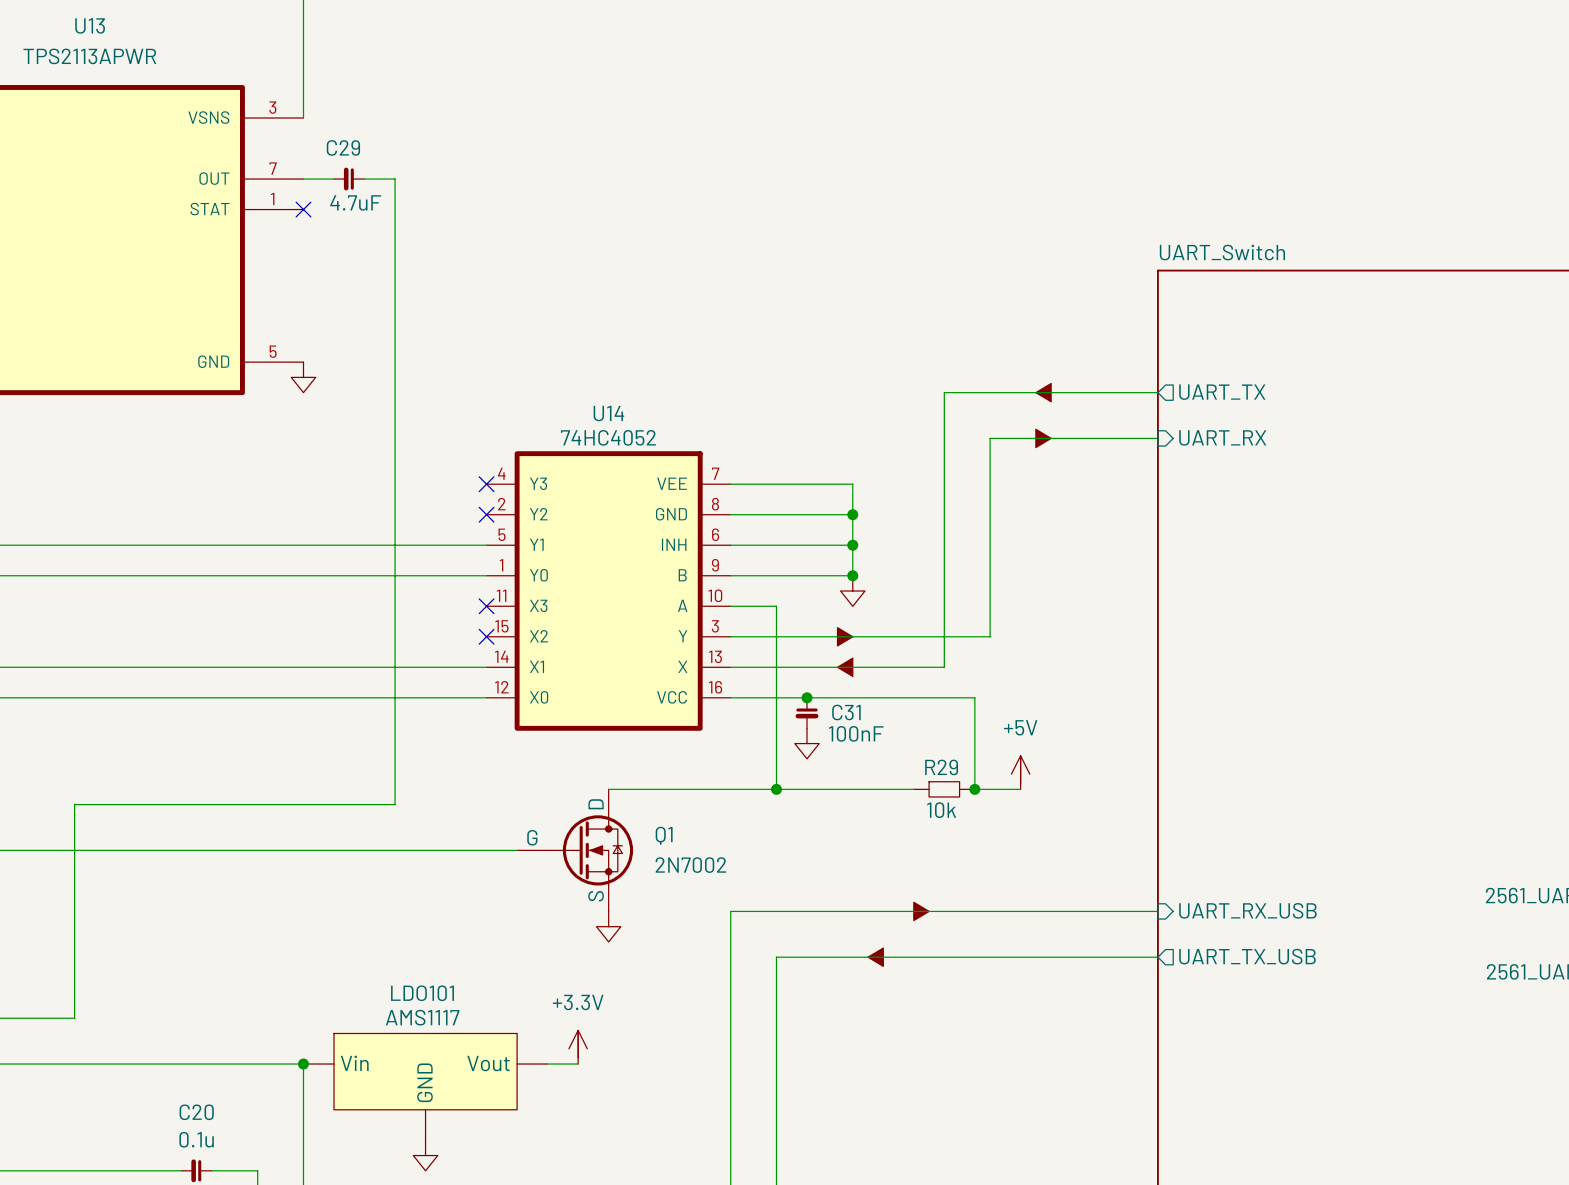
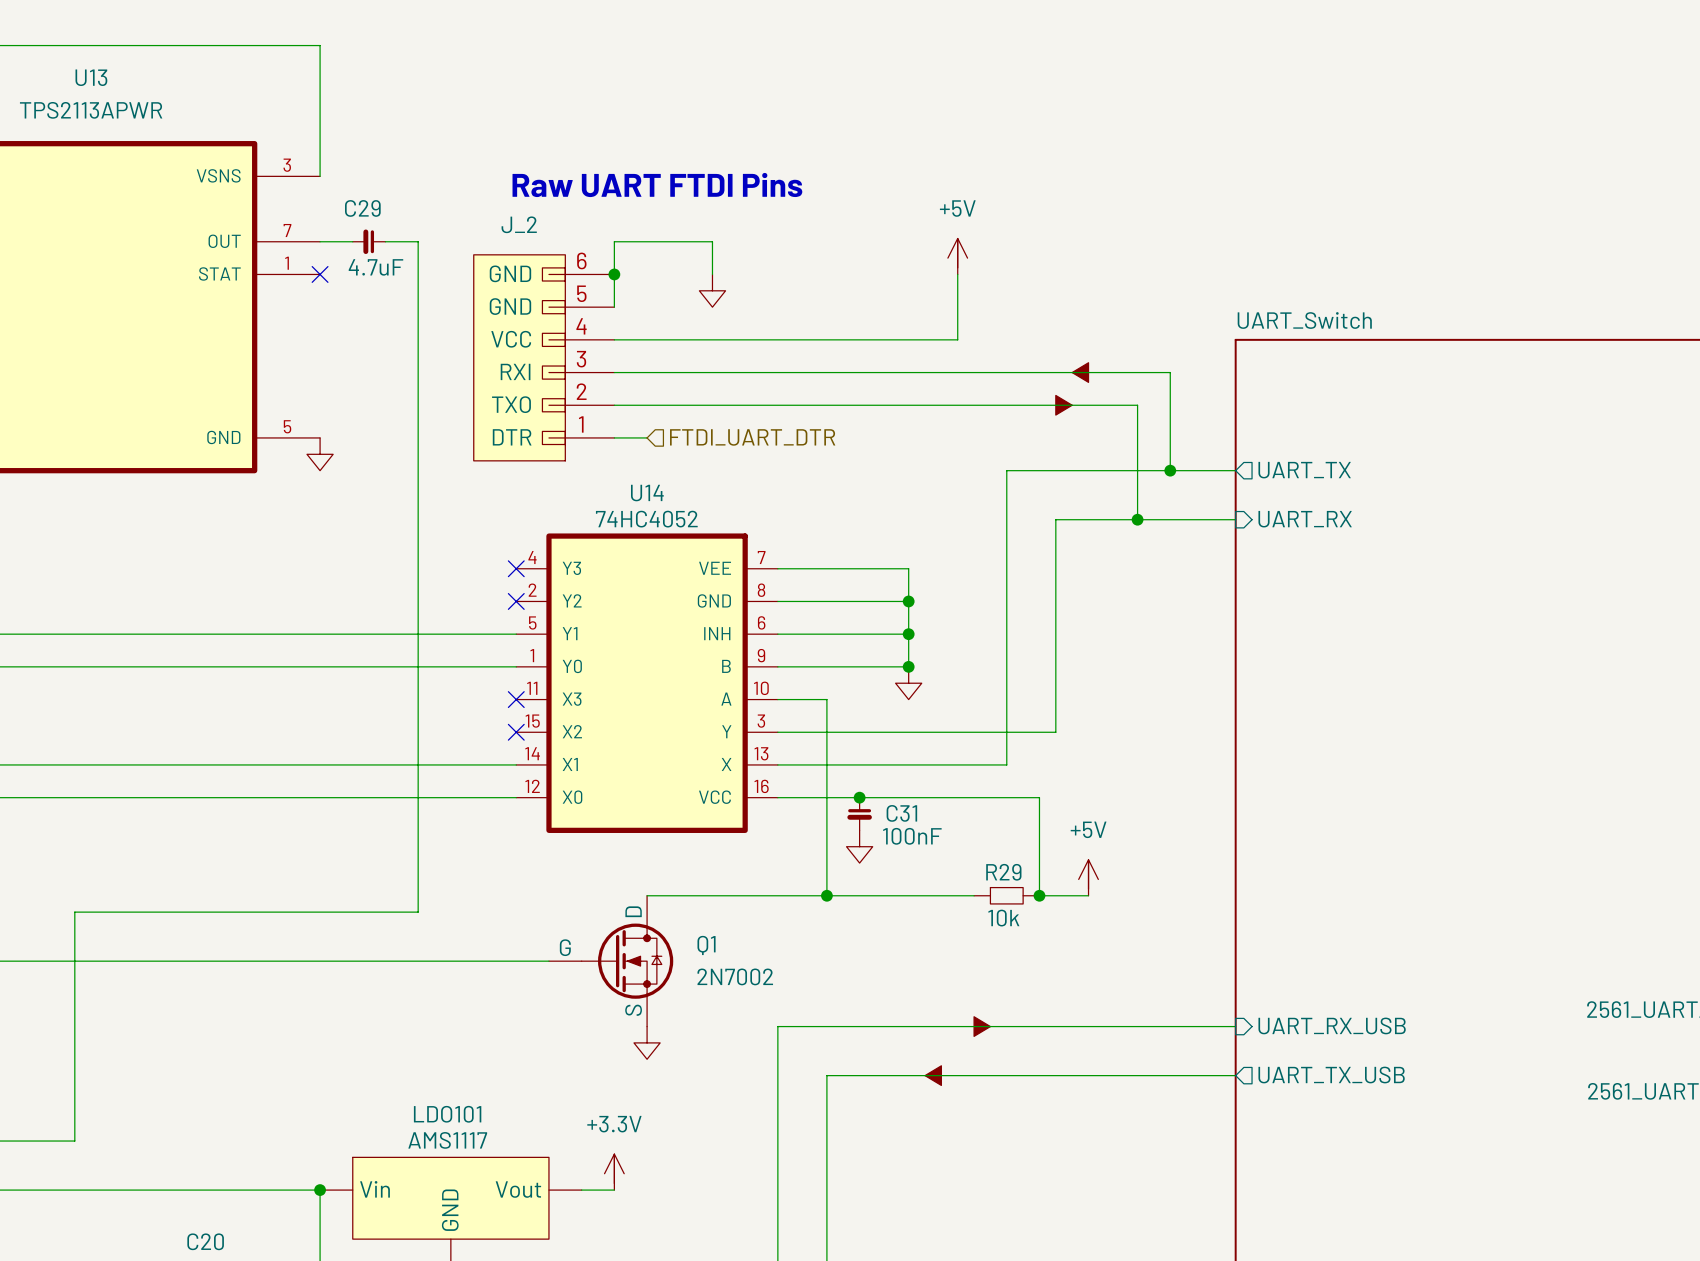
text: none -> Raw UART FTDI Pins (657, 185)
power symbol: none -> +5V (957, 256)
junction: none -> (614, 274)
wire: none -> (712, 274) (712, 241) (614, 241) (614, 307)
wire: none -> (957, 274) (957, 339) (614, 339)
power symbol: none -> (712, 290)
J_2: none -> (544, 357)
wire: none -> (614, 372) (1170, 372) (1170, 470)
part: none -> (1080, 372)
wire: none -> (614, 405) (1137, 405) (1137, 519)
part: none -> (1064, 405)
hierarchical label: none -> FTDI_UART_DTR (752, 437)
wire: none -> (614, 437) (647, 437)
part: (1043, 392) -> none
junction: none -> (1170, 470)
part: (1043, 438) -> none
junction: none -> (1137, 519)
part: (845, 636) -> none
part: (845, 667) -> none

